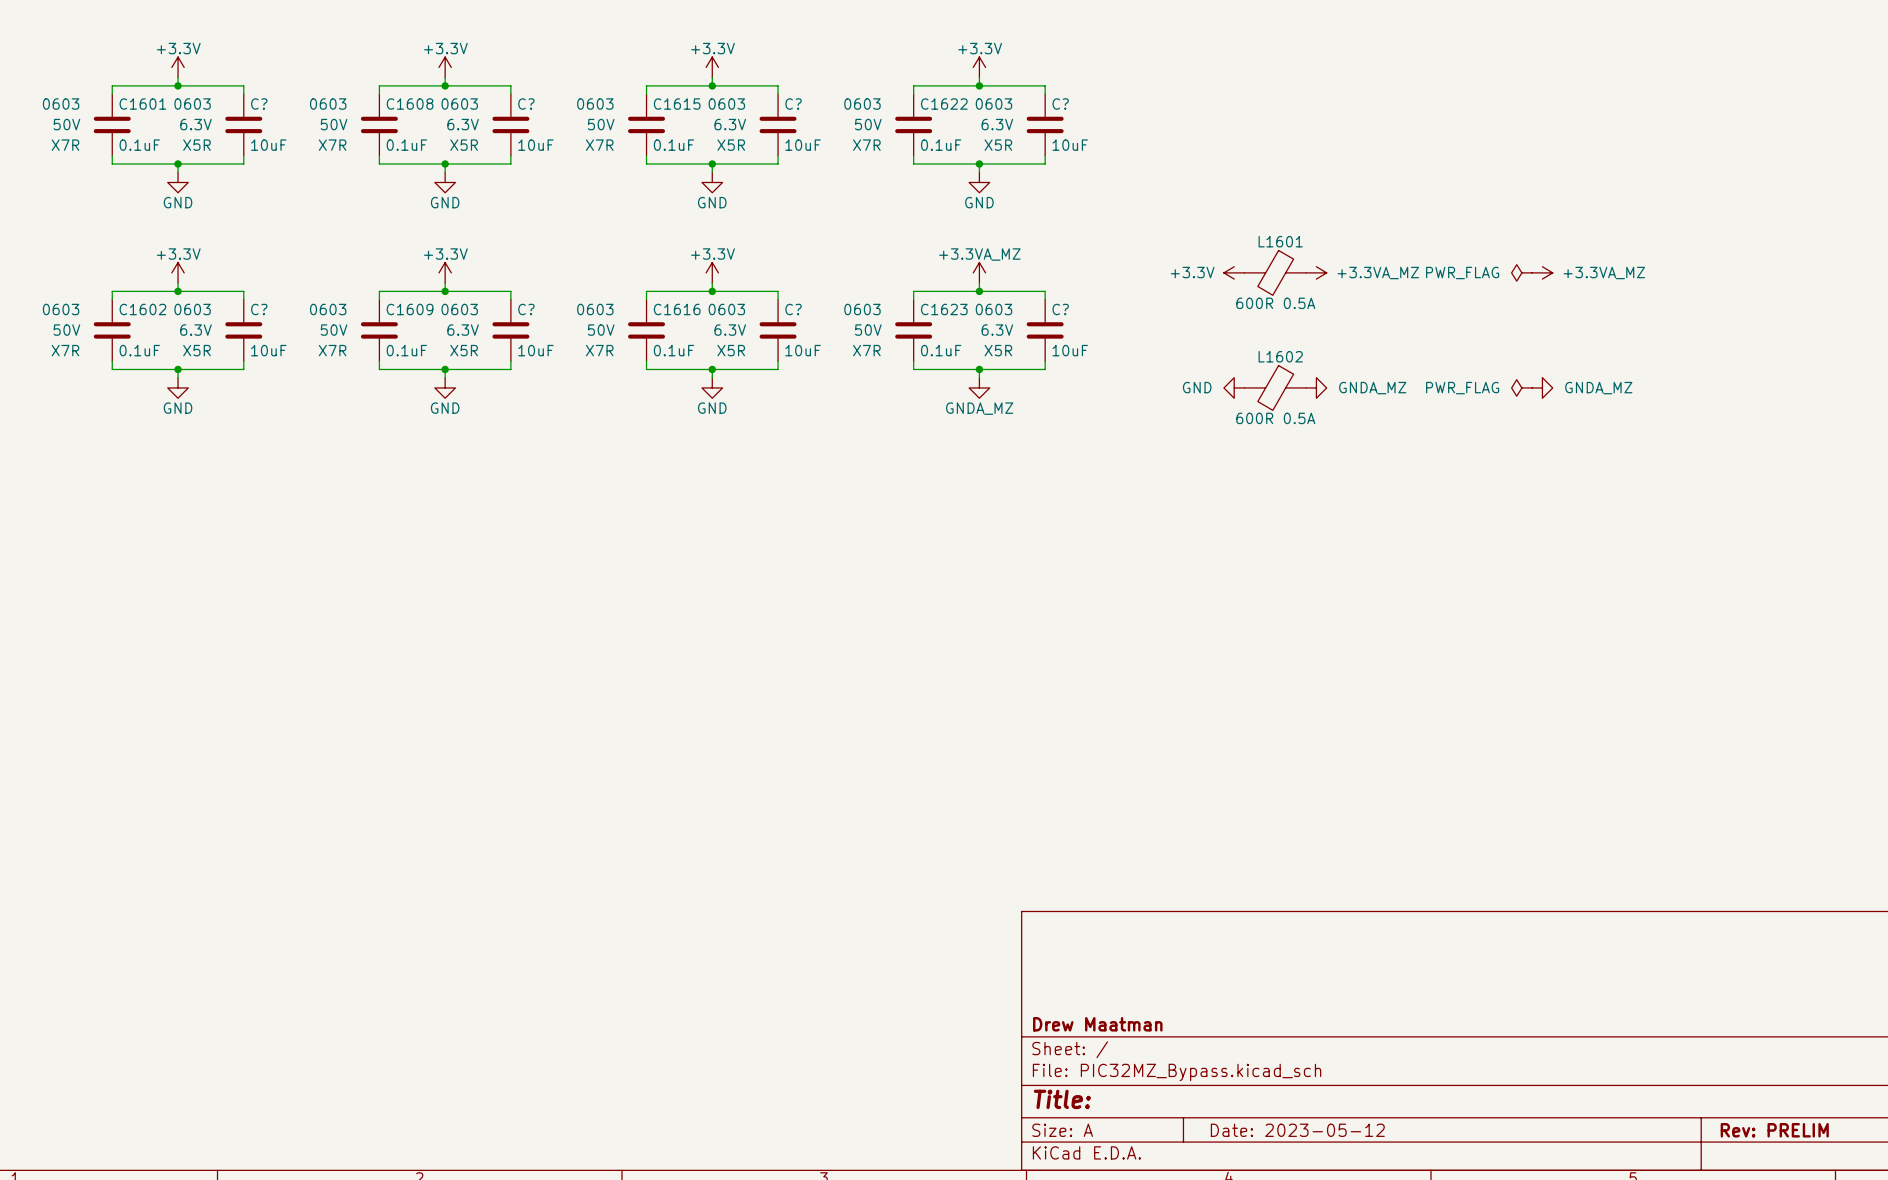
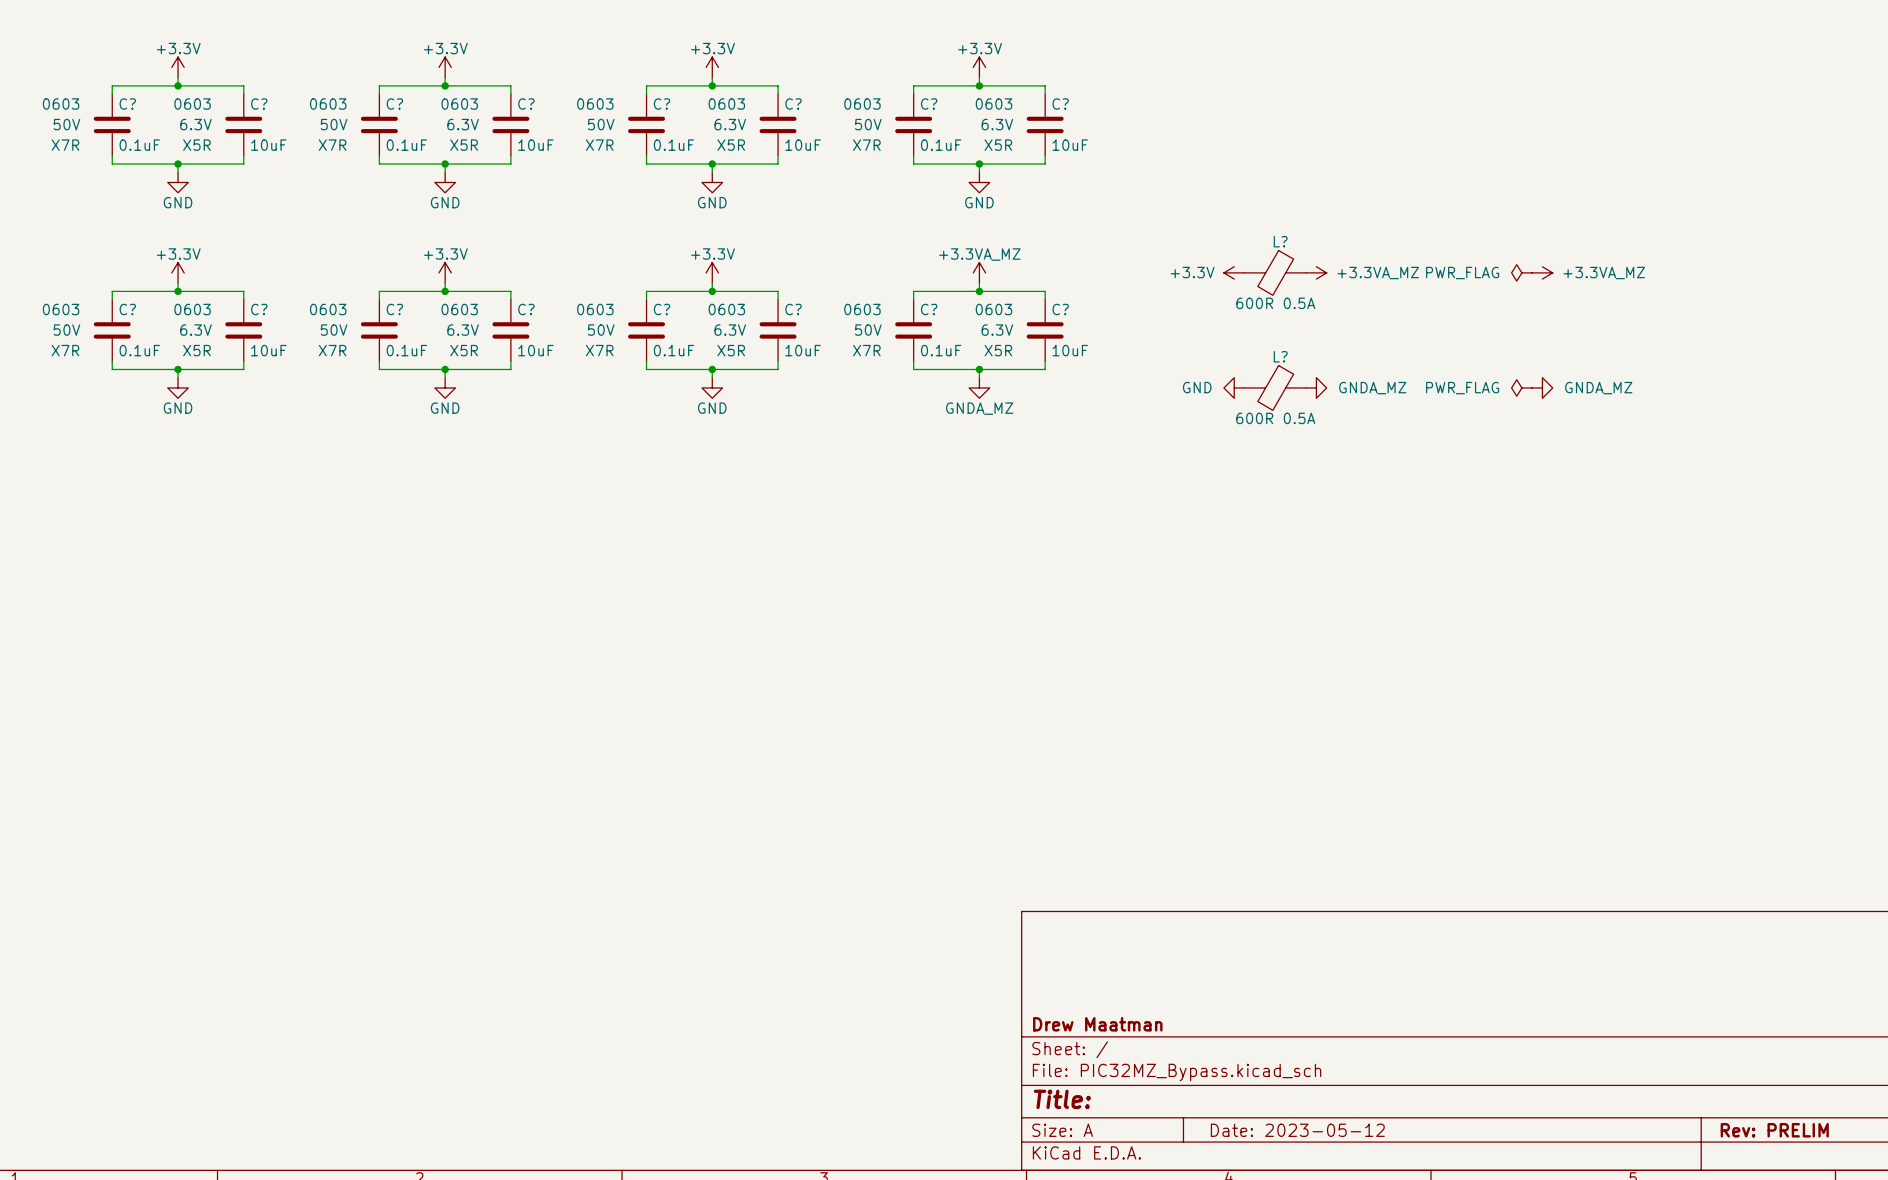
C1601 name: C1601 (142, 104) -> C? (127, 104)
C1608 name: C1608 (410, 104) -> C? (394, 104)
C1615 name: C1615 (677, 104) -> C? (662, 104)
C1622 name: C1622 (944, 104) -> C? (929, 104)
L1601 name: L1601 (1280, 241) -> L? (1280, 241)
C1602 name: C1602 (142, 309) -> C? (127, 309)
C1609 name: C1609 (410, 309) -> C? (394, 309)
C1616 name: C1616 (677, 309) -> C? (662, 309)
C1623 name: C1623 (944, 309) -> C? (929, 309)
L1602 name: L1602 (1280, 356) -> L? (1280, 356)

